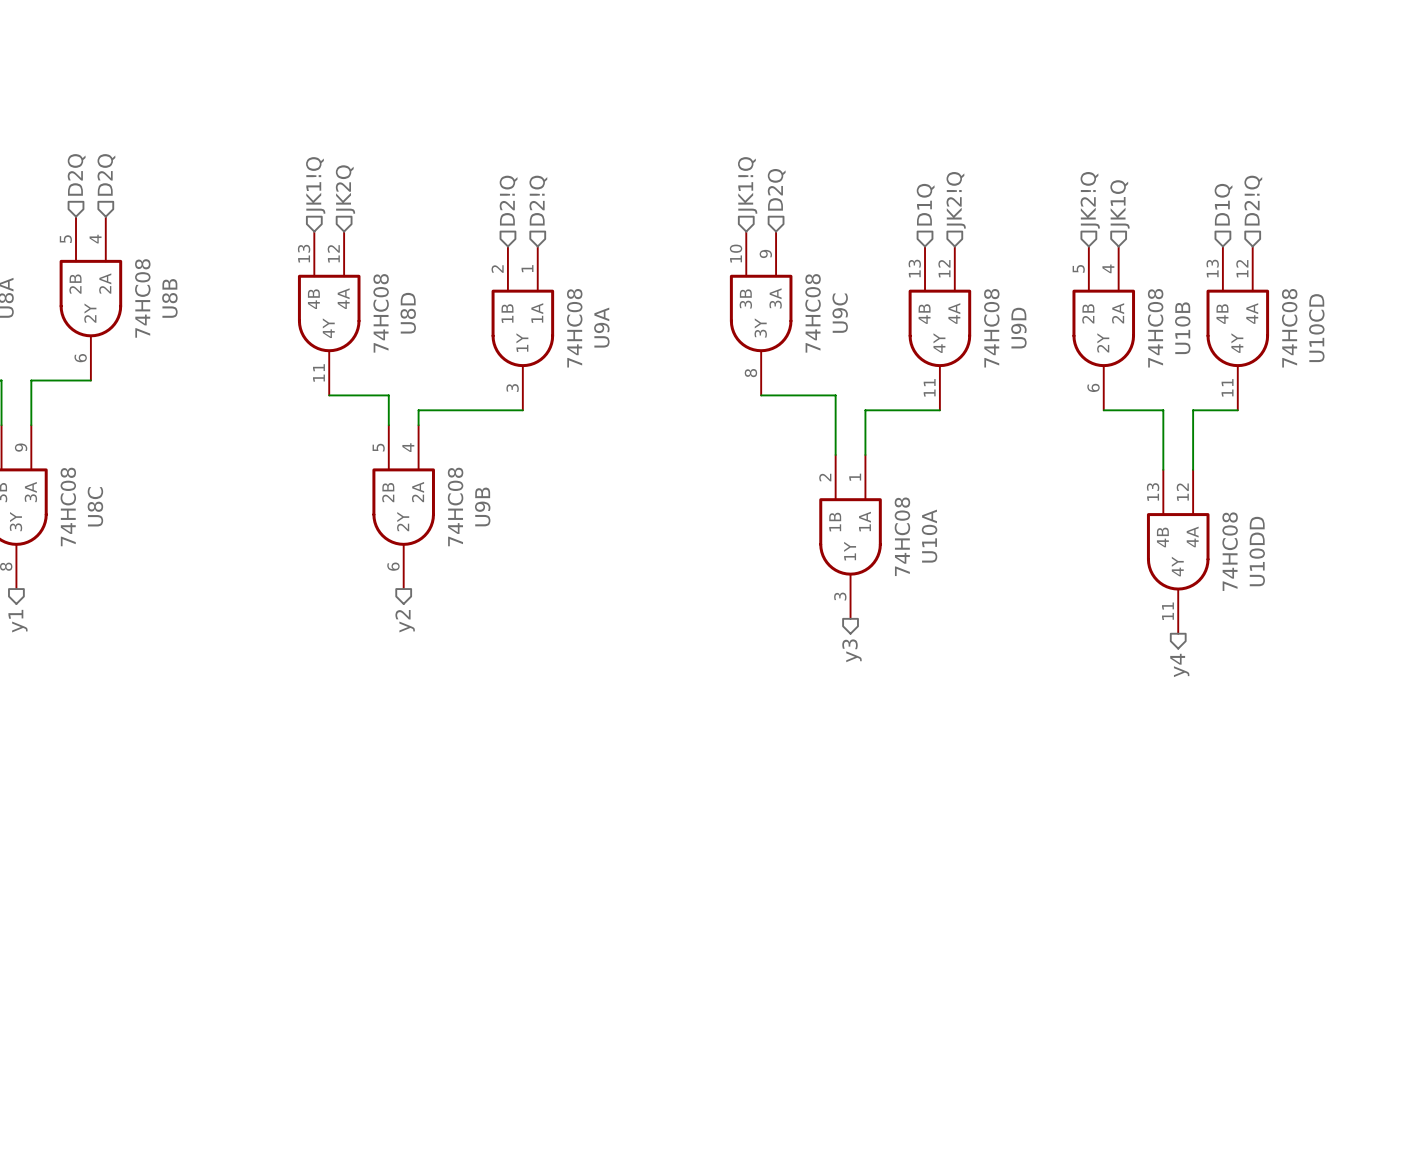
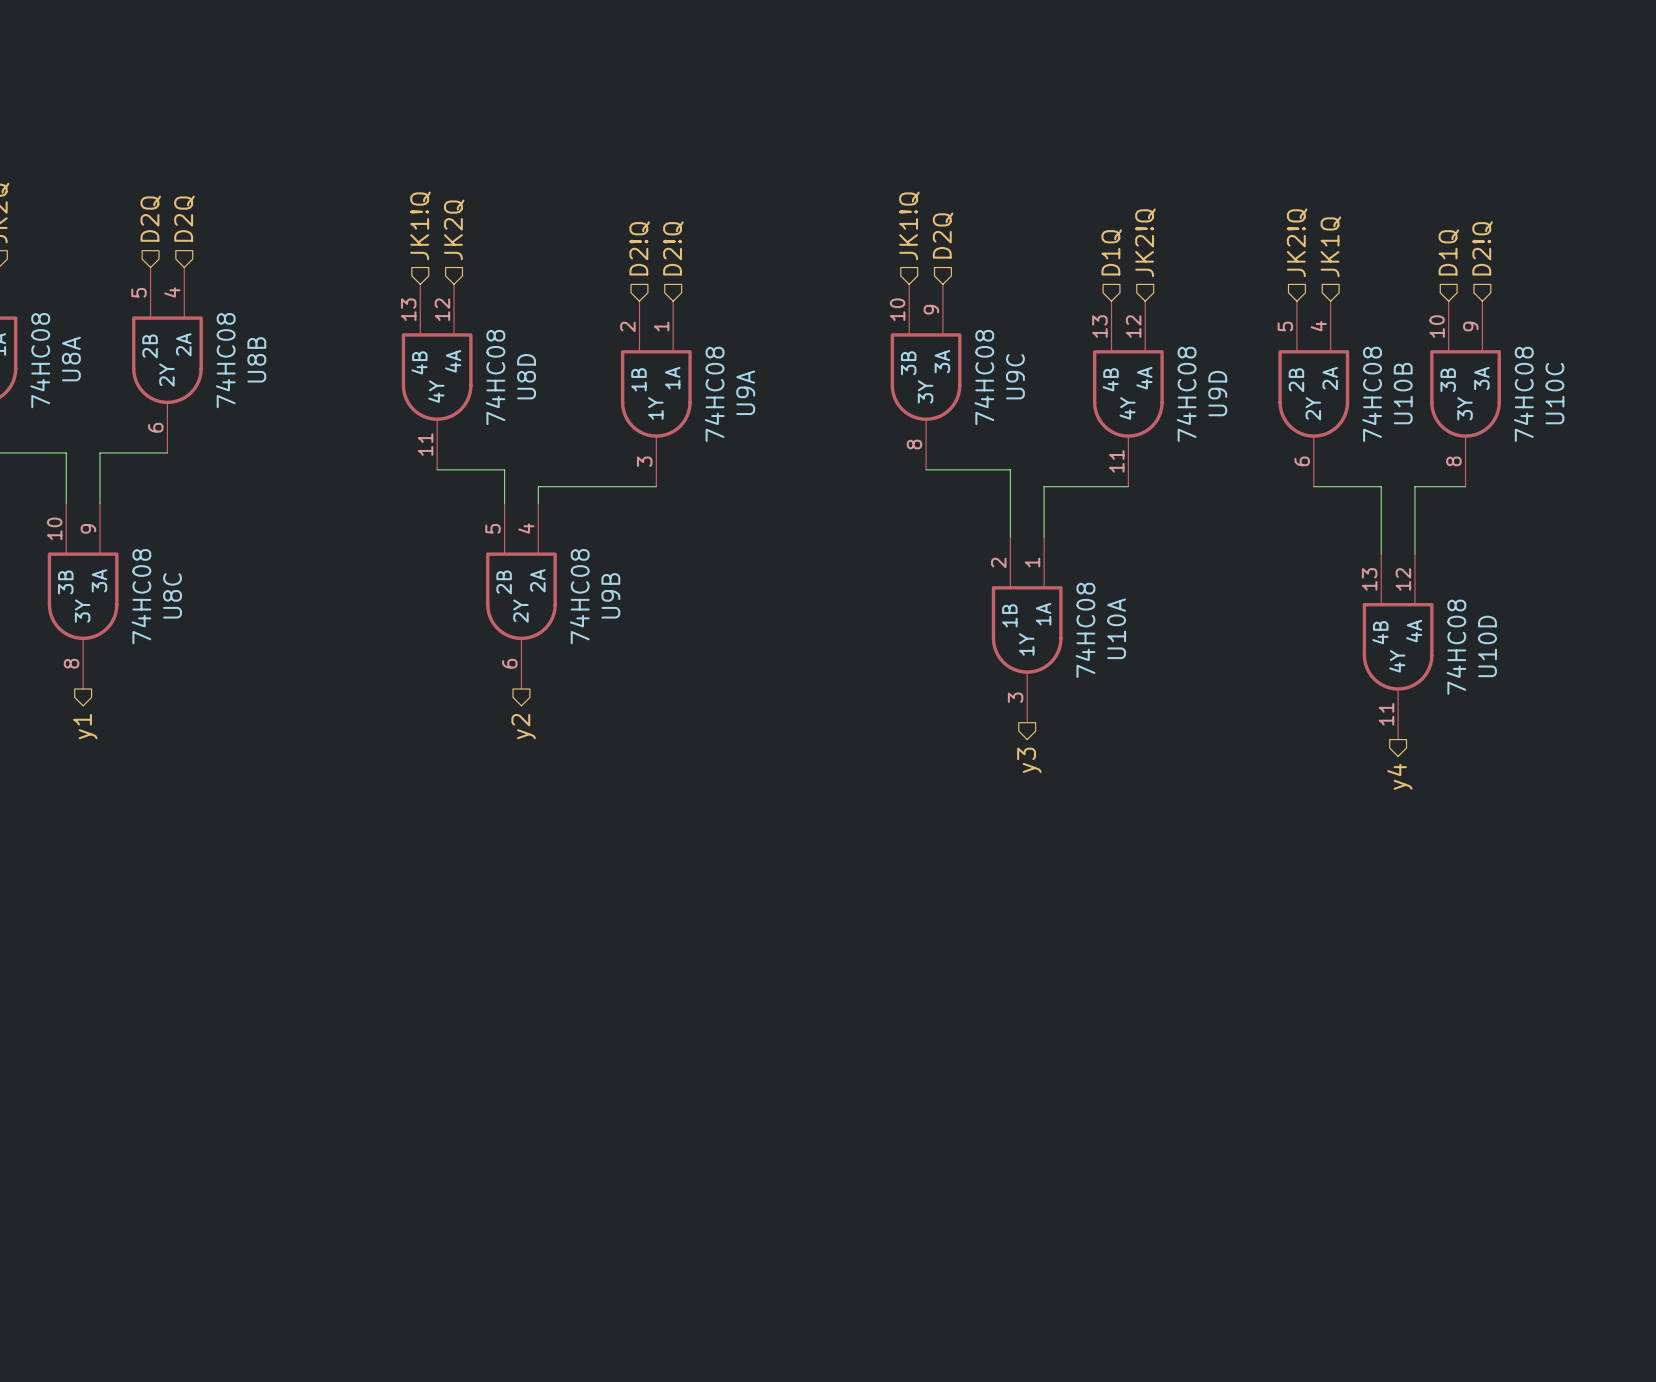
U10CD pin number: 13 (1212, 268) -> 10 (1437, 326)
U10CD pin number: 12 (1242, 268) -> 9 (1470, 326)
U10CD pin name: 4A (1252, 313) -> 3A (1481, 378)
U10CD pin name: 4B (1222, 314) -> 3B (1448, 380)
U10CD name: U10CD (1316, 328) -> U10C (1554, 393)
U10CD pin name: 4Y (1237, 343) -> 3Y (1465, 408)
U10CD pin number: 11 (1227, 387) -> 8 (1453, 461)
U10DD name: U10DD (1257, 551) -> U10D (1487, 646)

